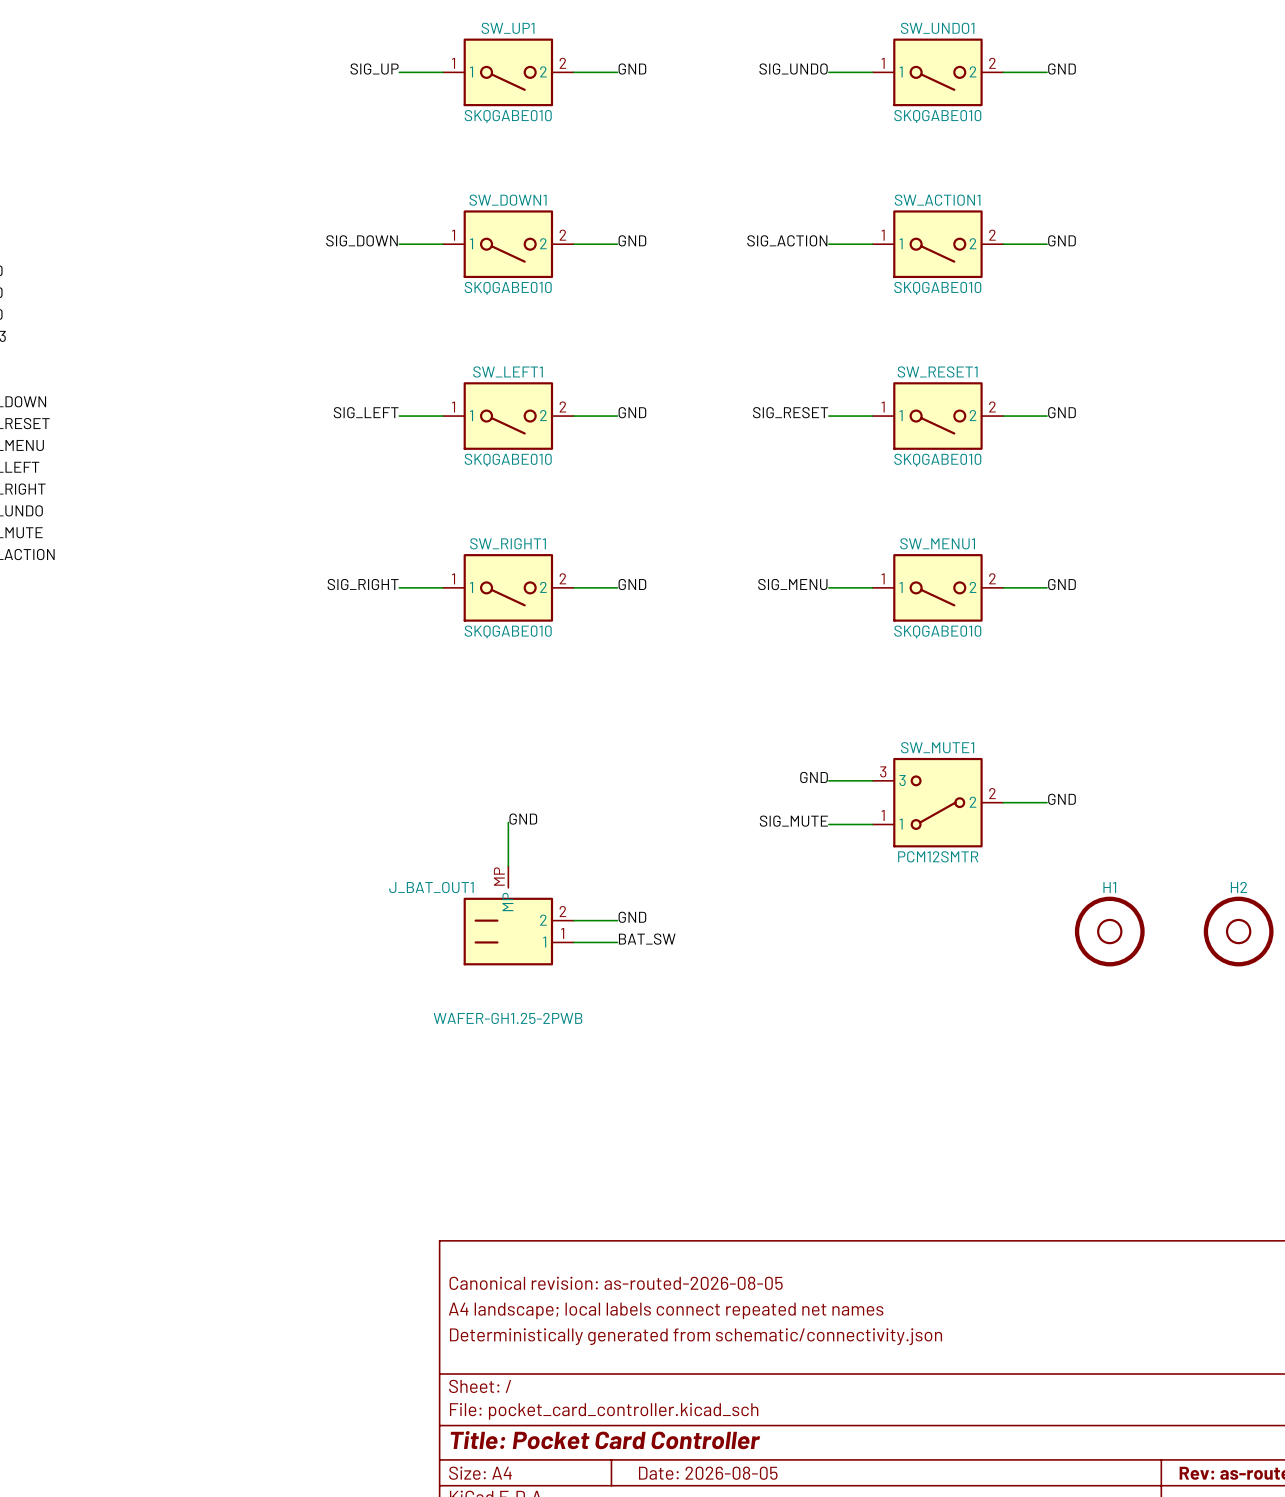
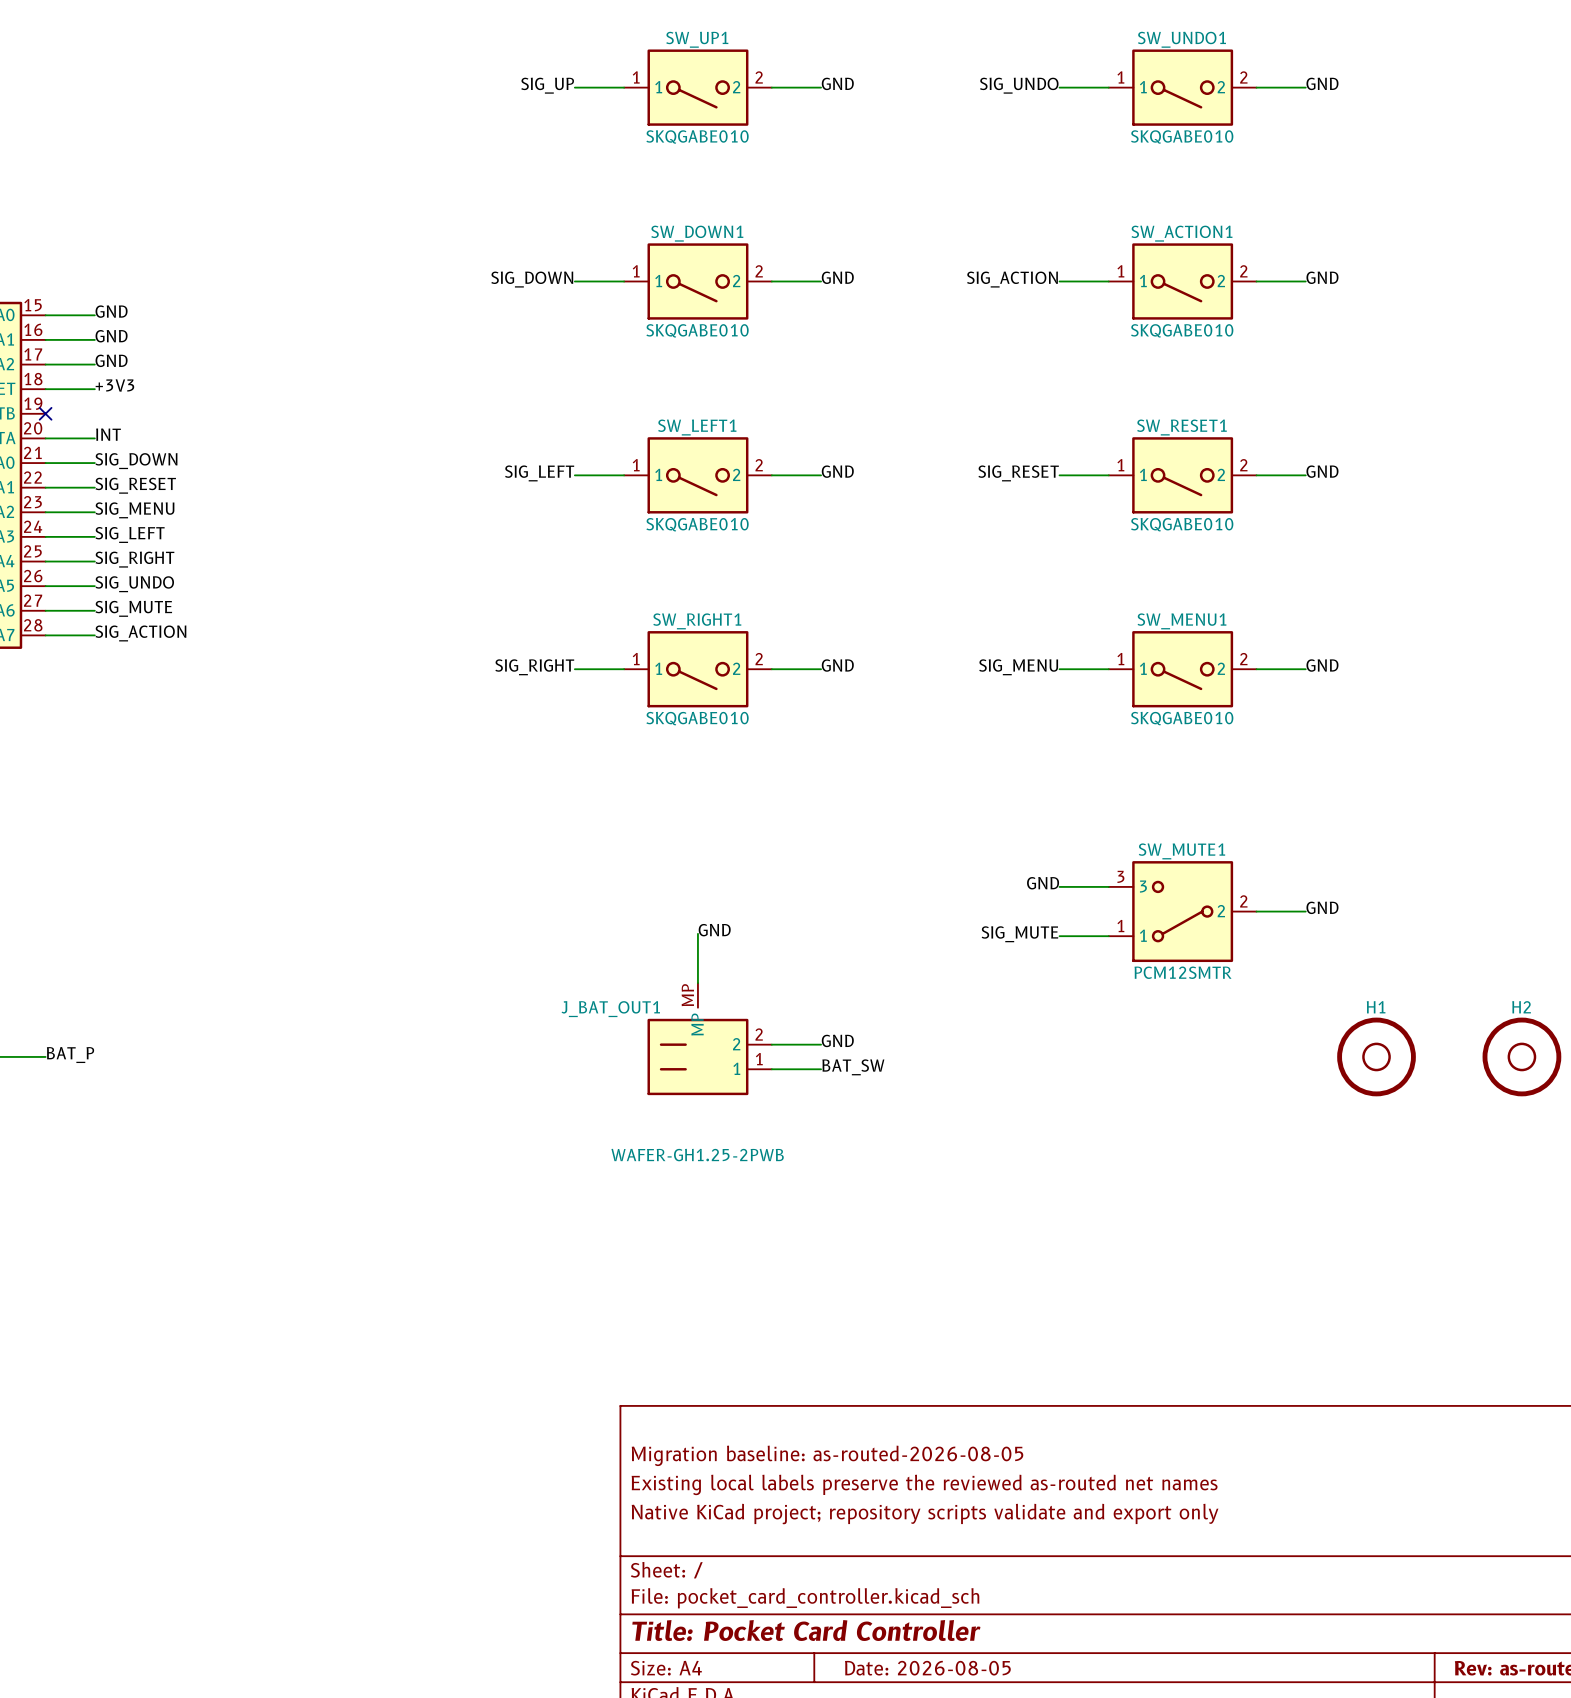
title block: Canonical revision: as-routed-2026-08-05 (616, 1283) -> Migration baseline: as-routed-2026-08-05 (827, 1455)
title block: A4 landscape; local labels connect repeated net names (666, 1310) -> Existing local labels preserve the reviewed as-routed net names (924, 1484)
title block: Deterministically generated from schematic/connectivity.json (696, 1336) -> Native KiCad project; repository scripts validate and export only (925, 1514)

